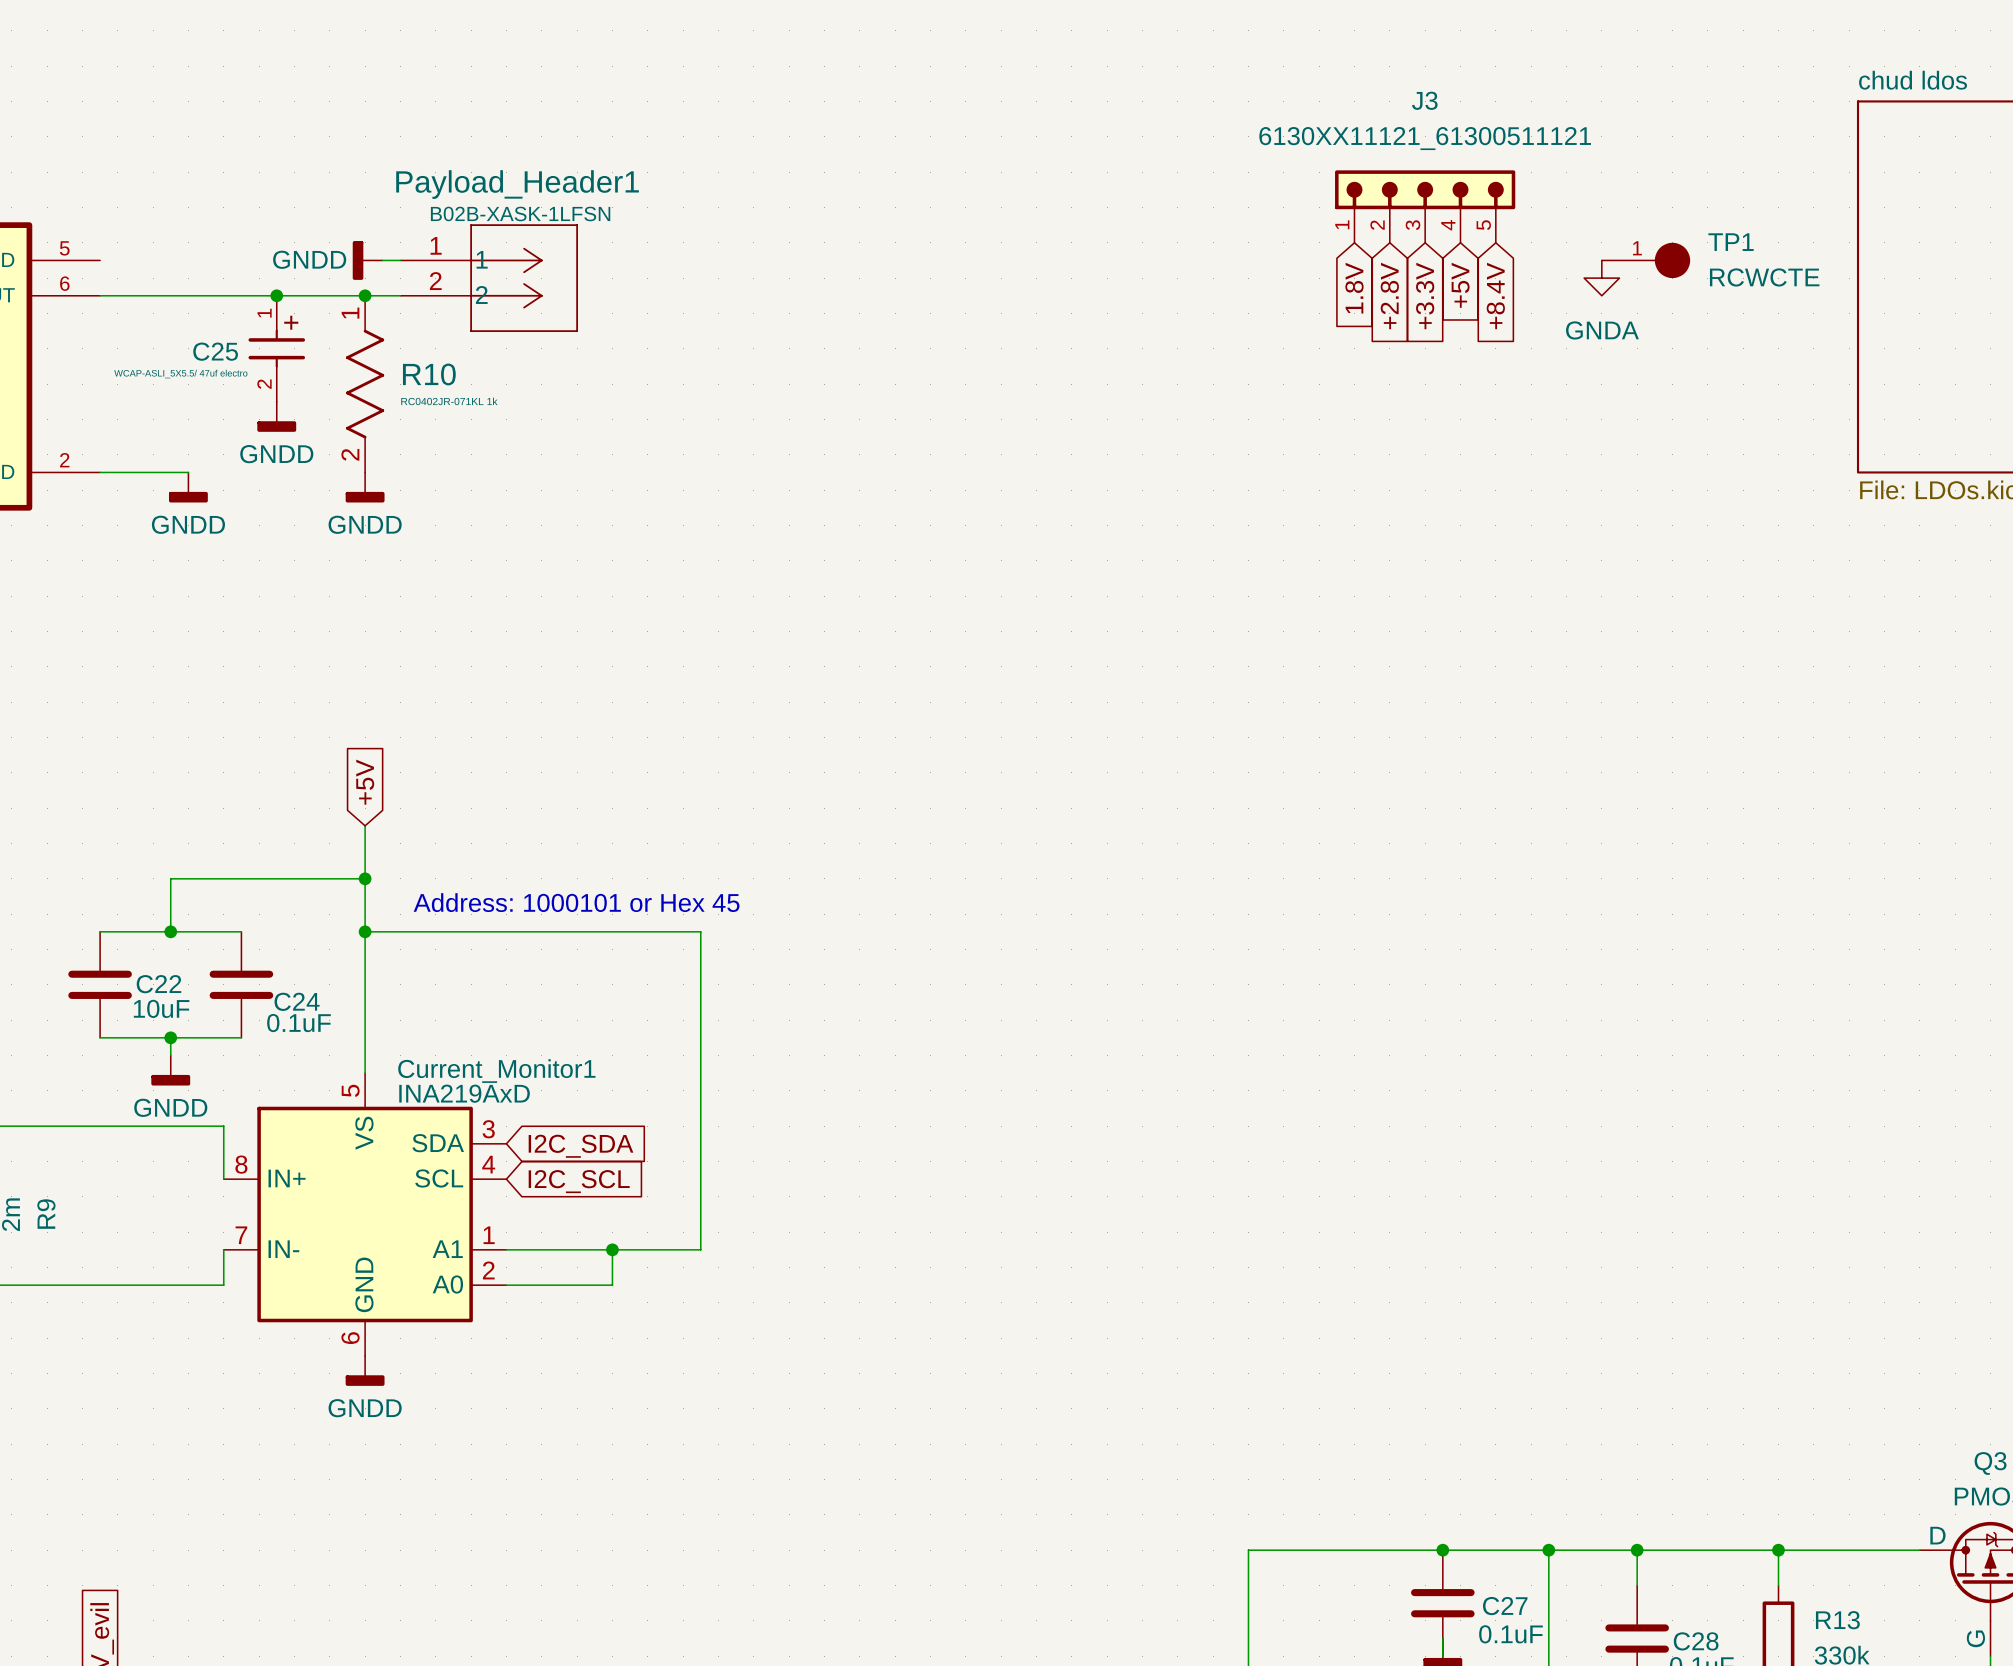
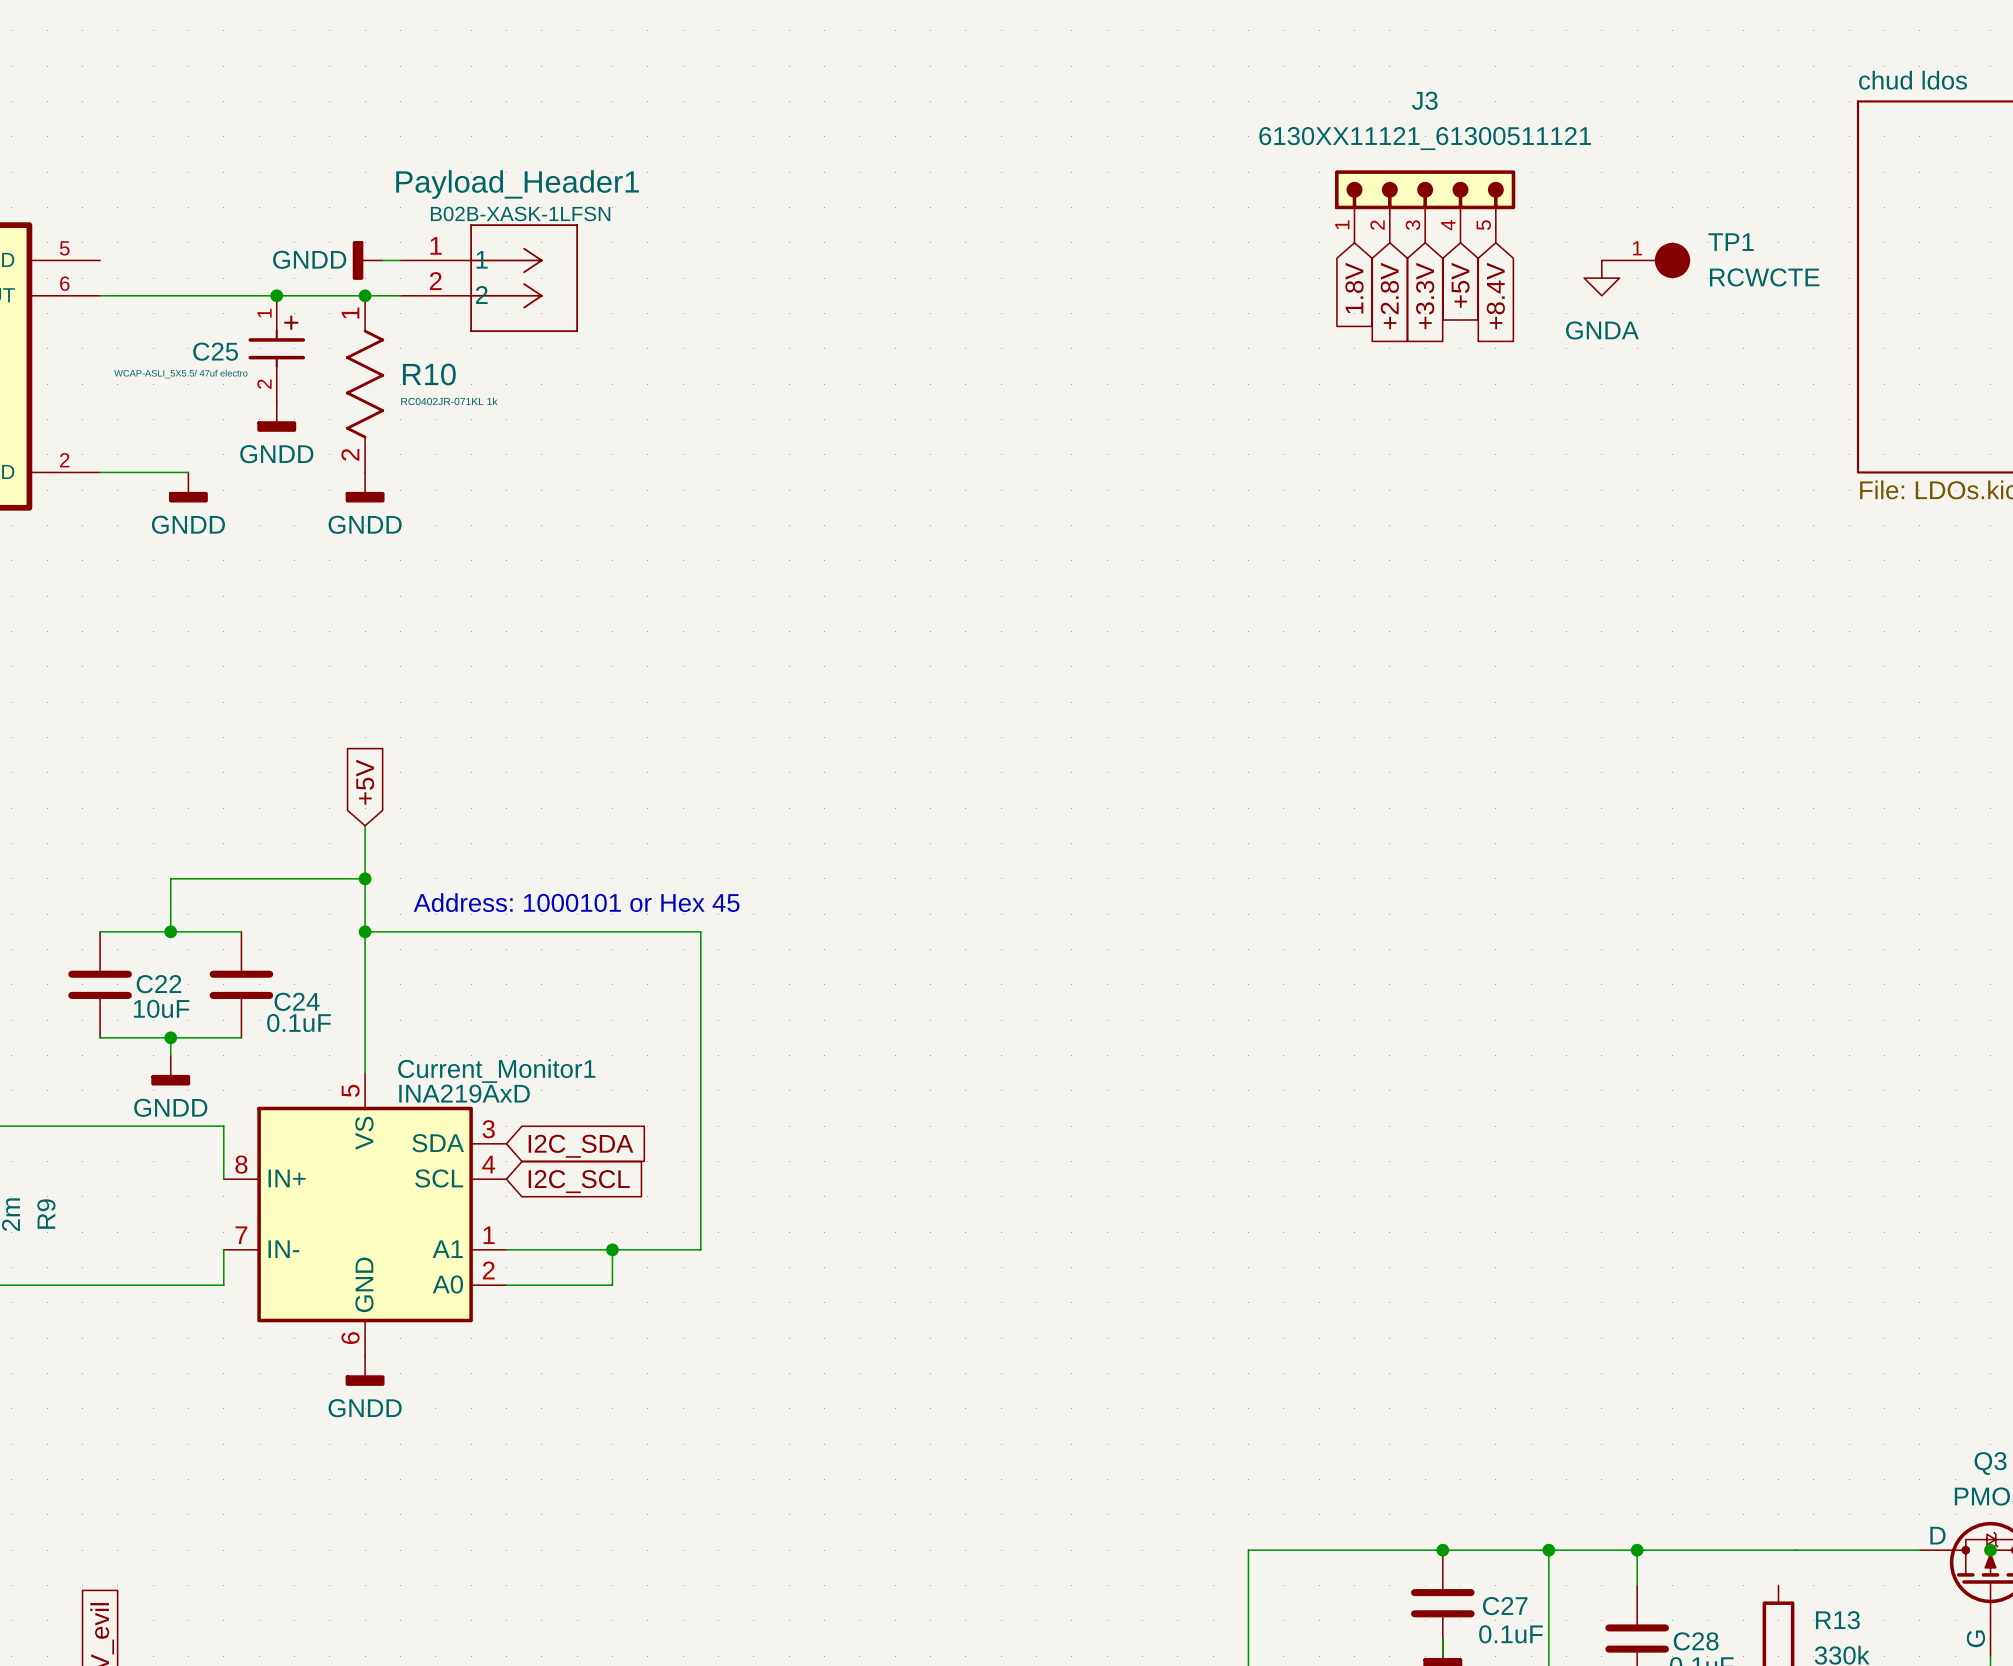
wire: (1778, 1550) (1778, 1585) -> none
junction: (1778, 1550) -> none
junction: none -> (1990, 1550)

